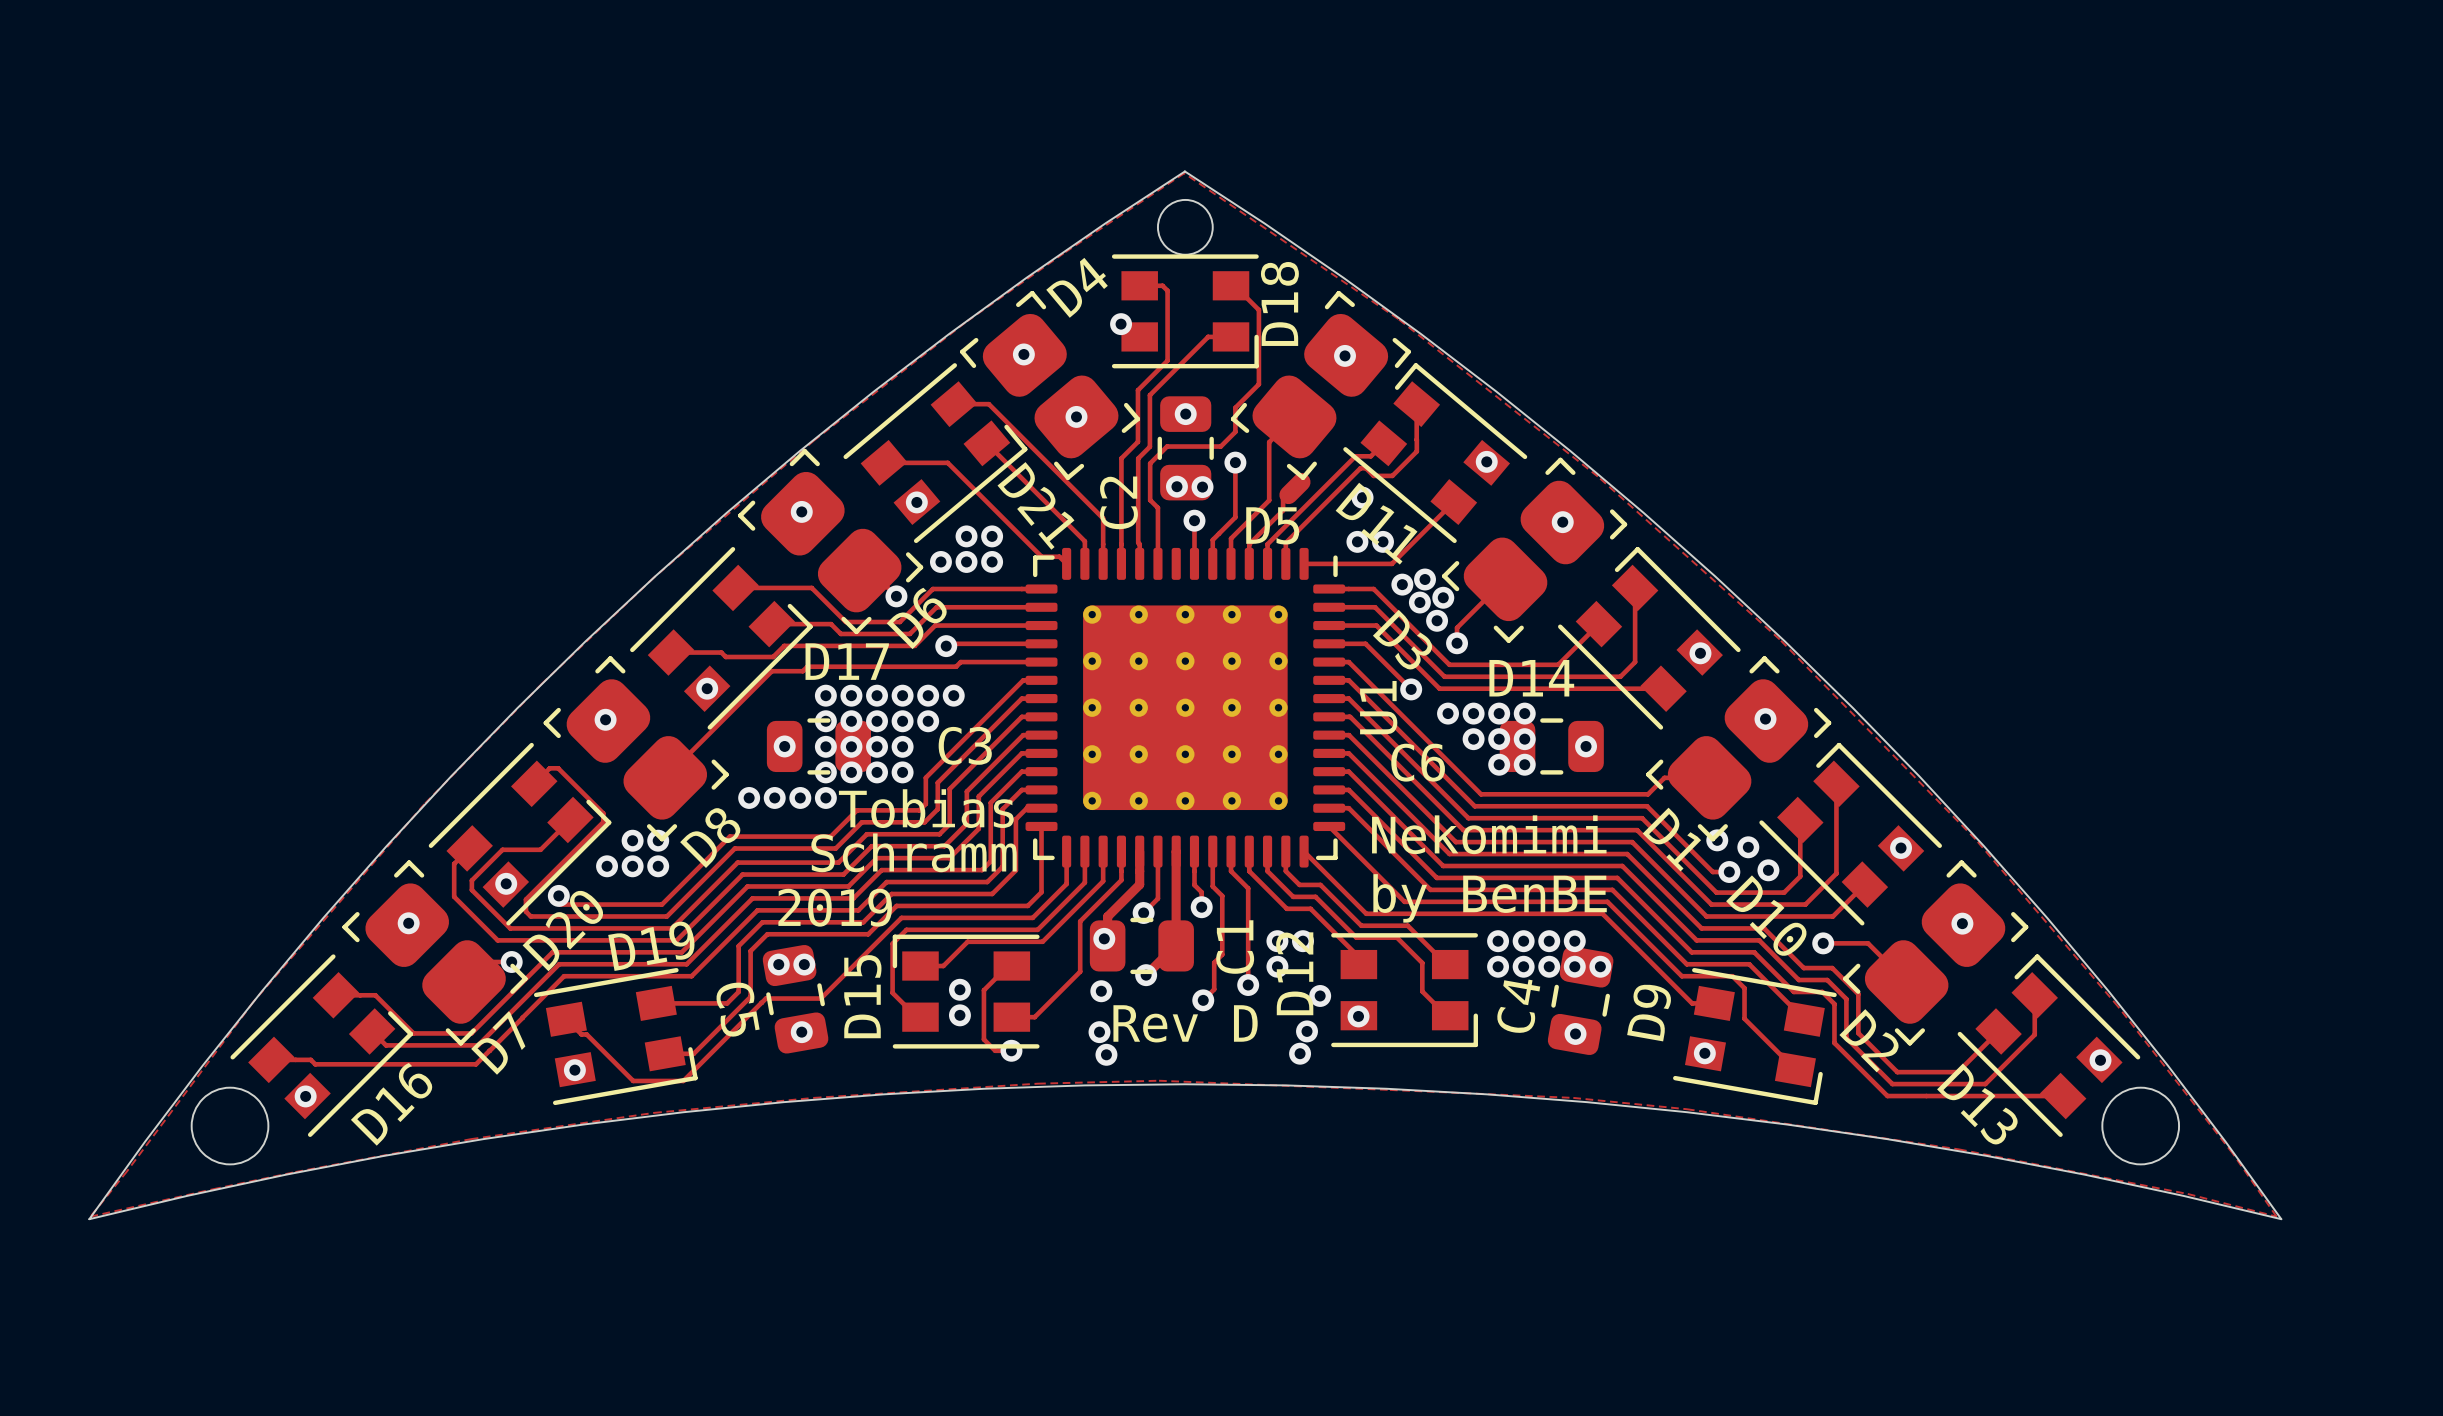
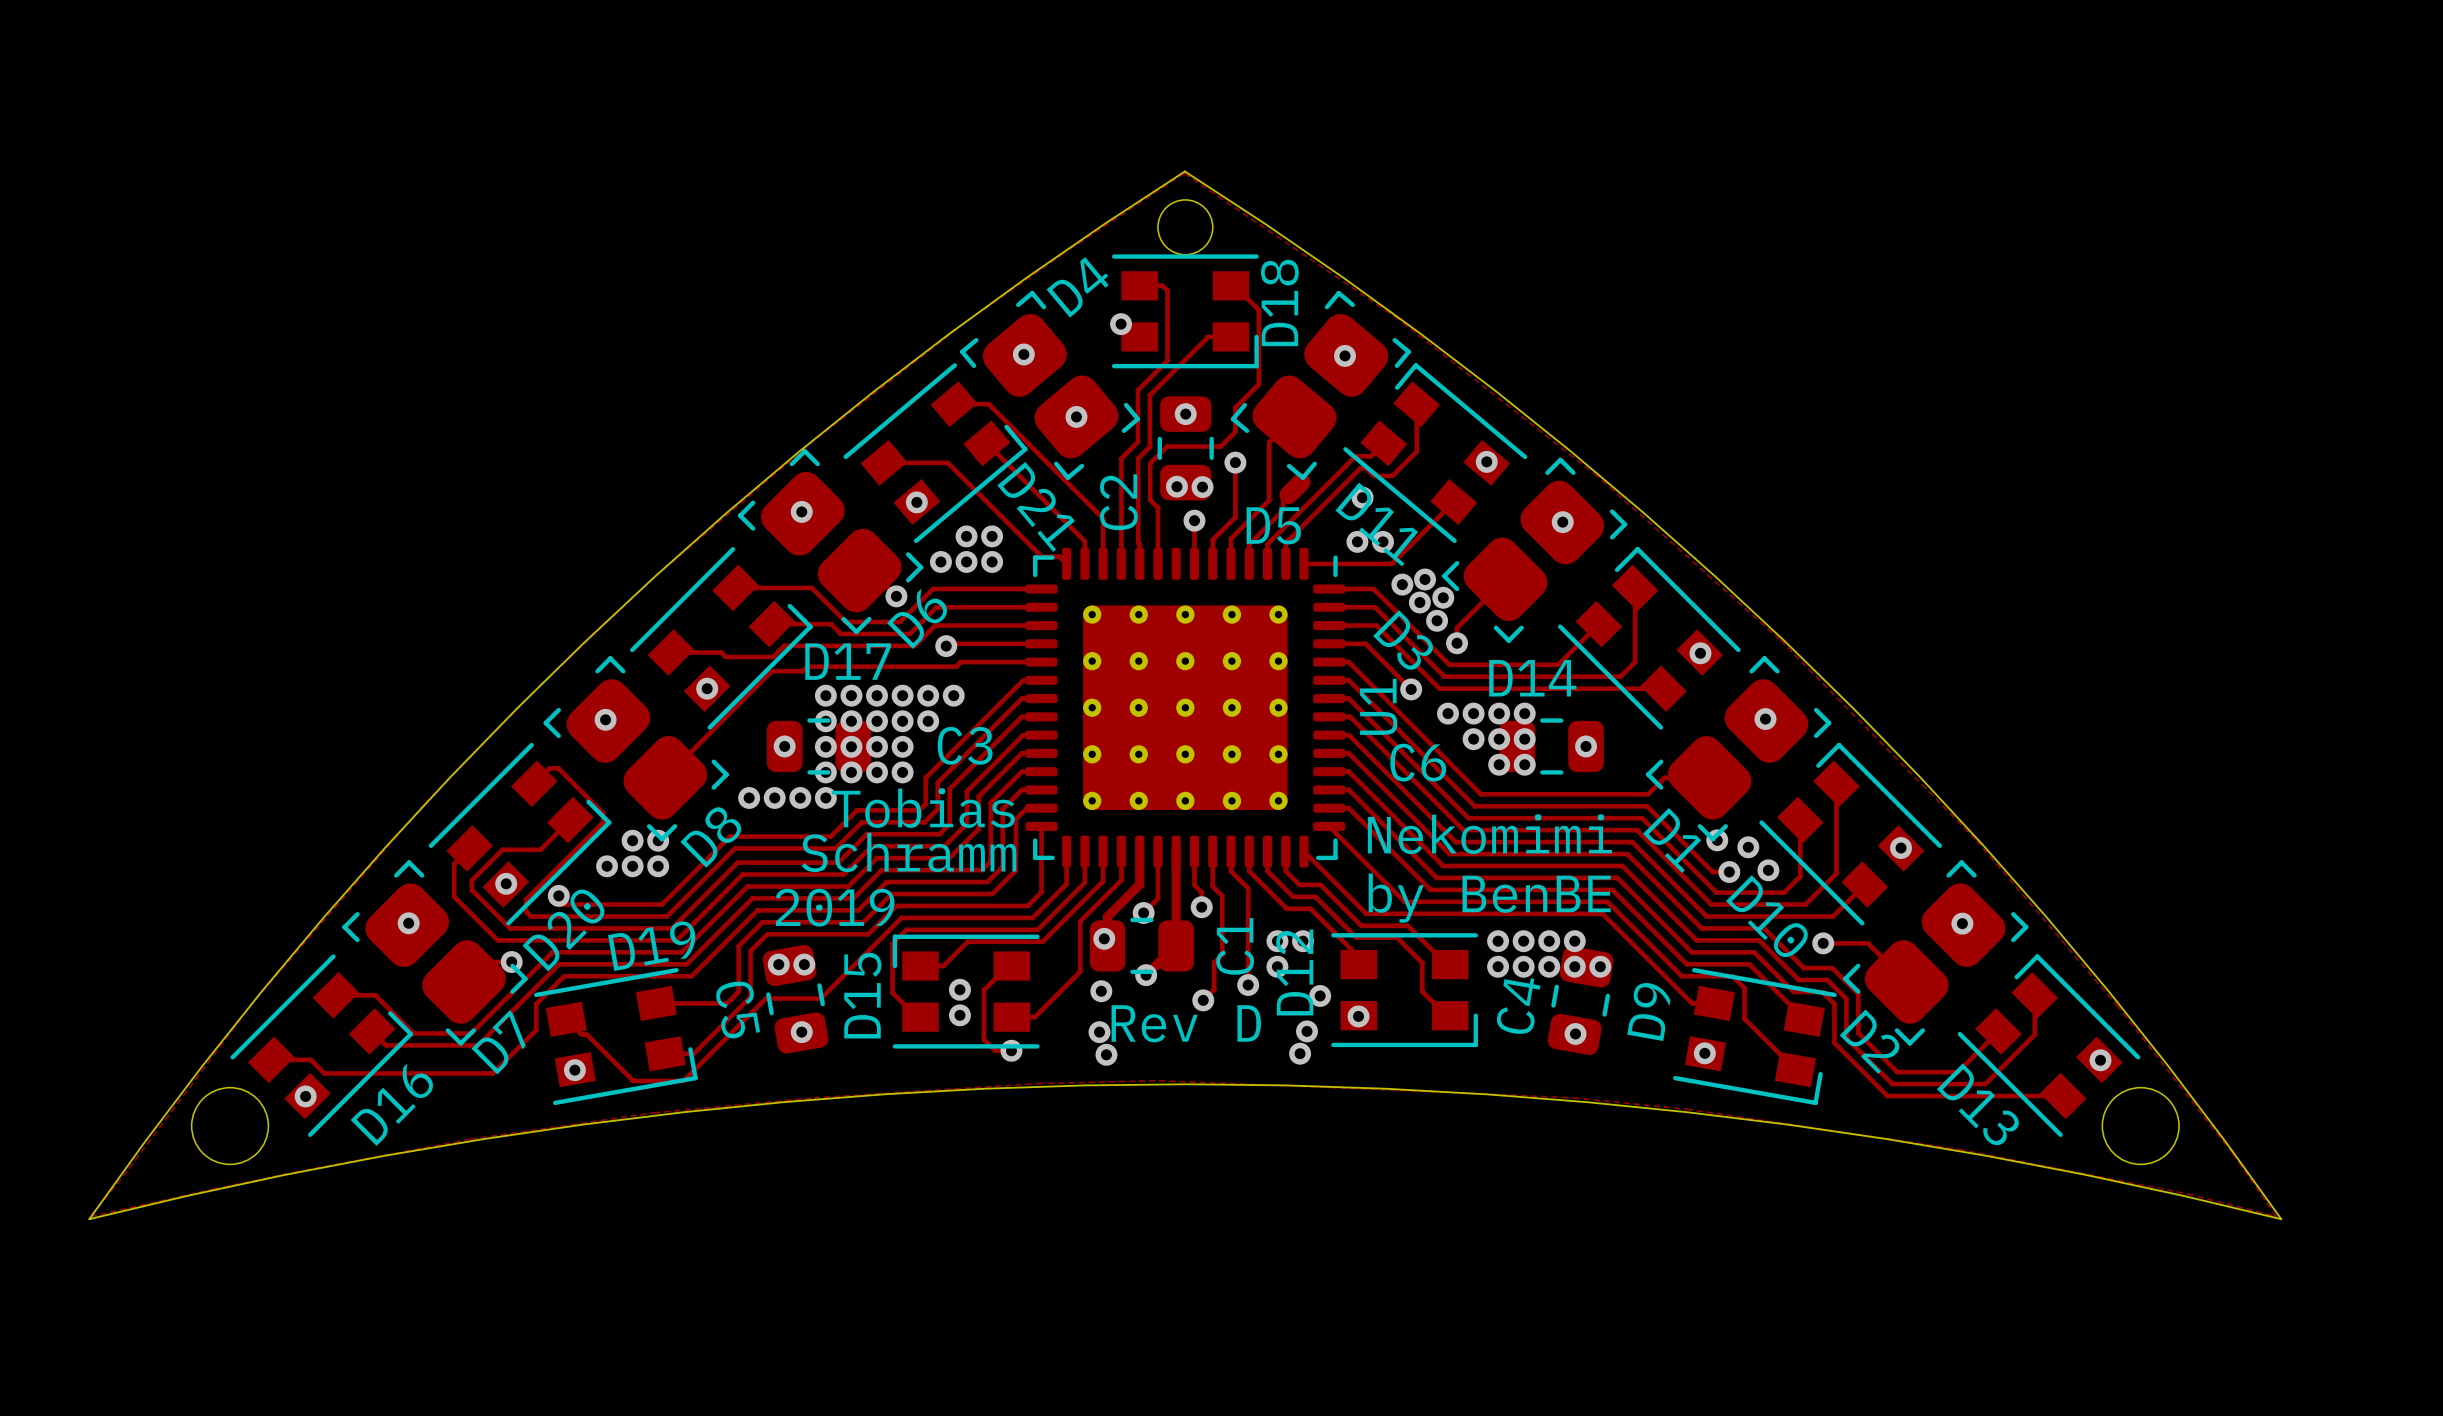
track: (536, 1004) (522, 1017) -> none
track: (522, 1017) (489, 1050) -> none
track: (489, 1050) (475, 1064) (315, 1064) -> (536, 1004) (536, 1030) (492, 1073) (324, 1073) (315, 1064)

